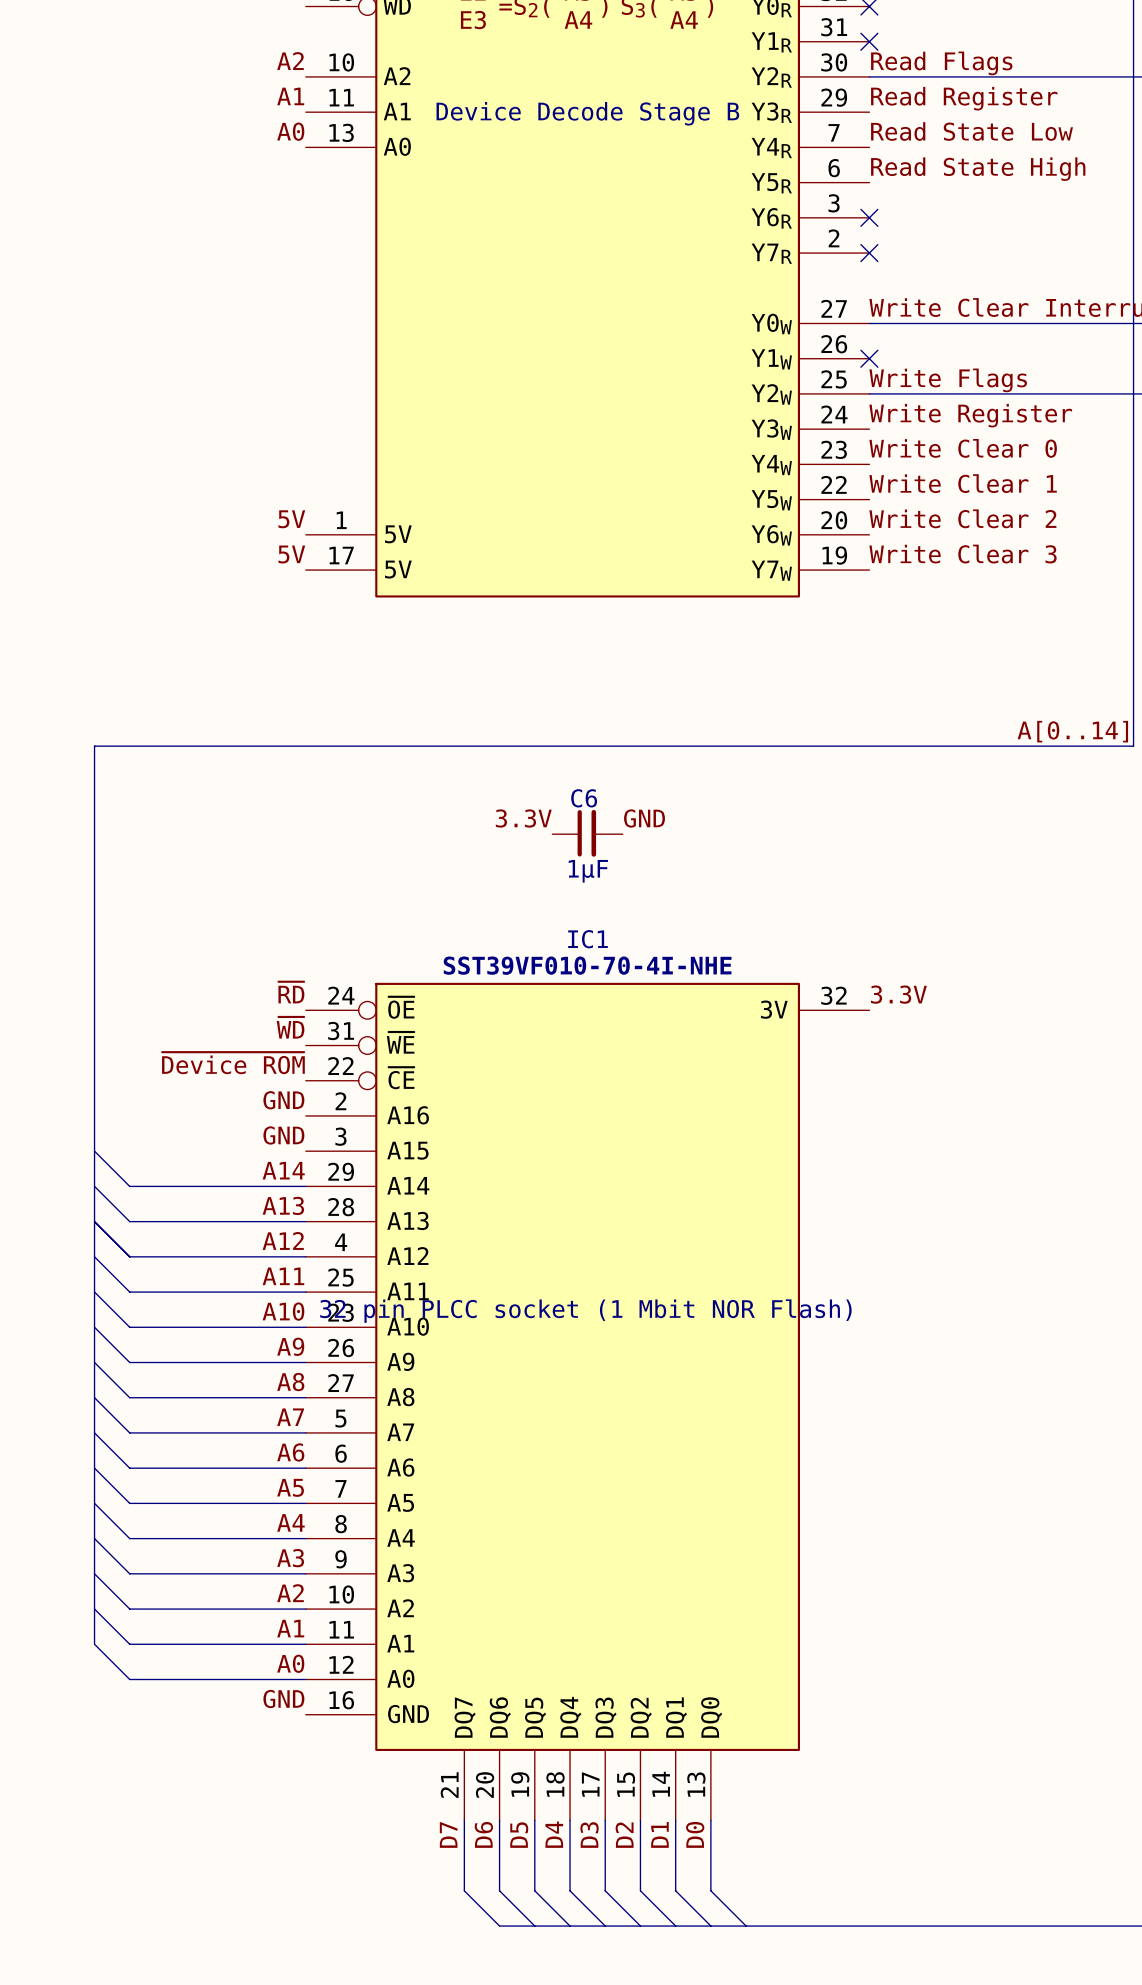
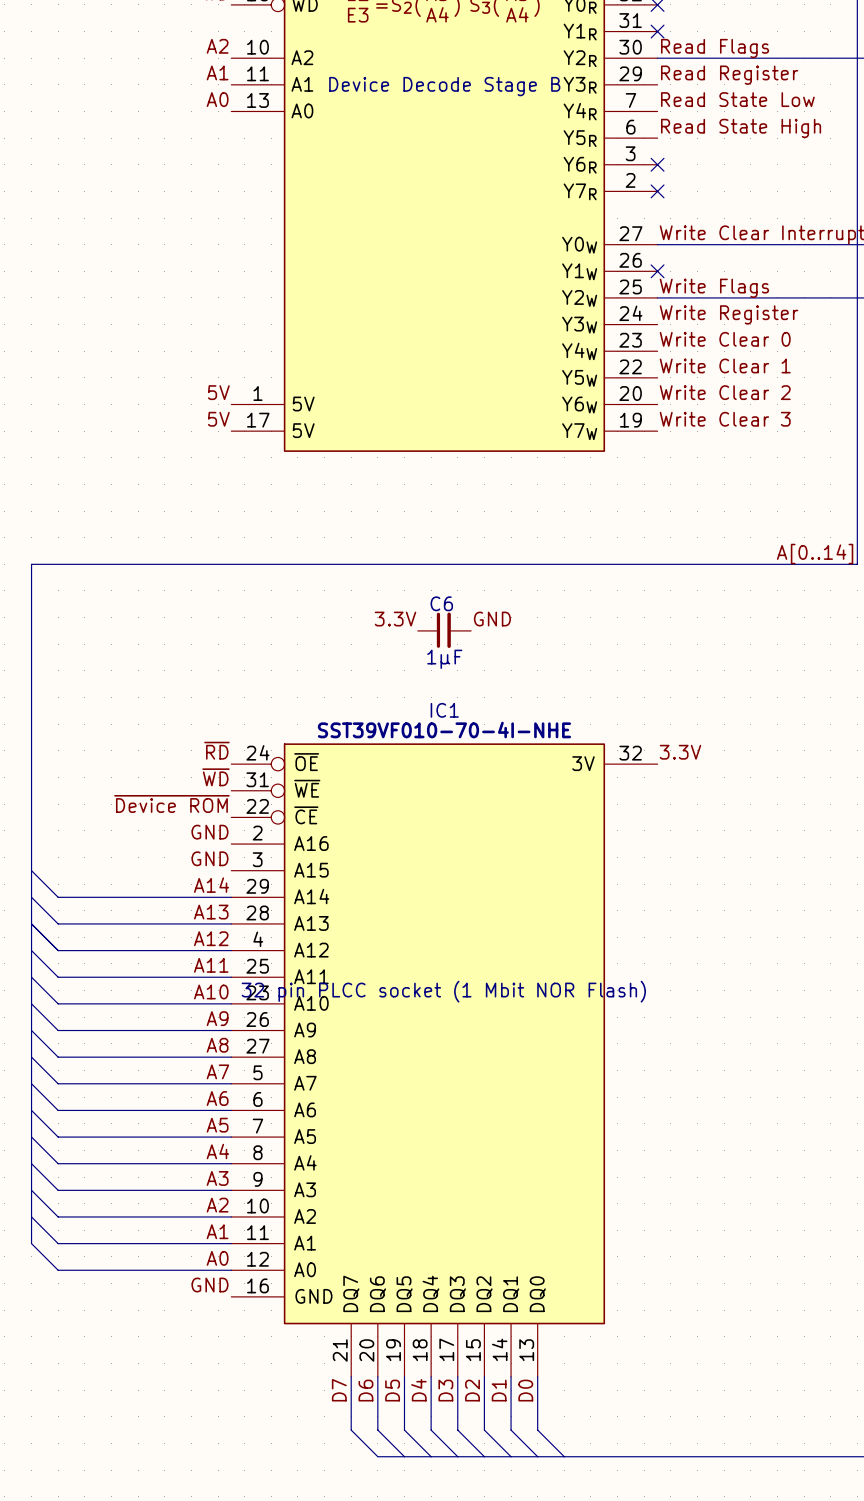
bus: (94, 746) (94, 1644) -> (71, 564) (31, 564) (31, 1243)
wire: (94, 1151) (129, 1186) -> (31, 870) (58, 897) (98, 897)
wire: (94, 1186) (129, 1221) -> (31, 897) (58, 923) (98, 923)
wire: (94, 1221) (129, 1256) -> (31, 923) (58, 950) (98, 950)
wire: (94, 1256) (129, 1292) -> (31, 950) (58, 977) (98, 977)
wire: (94, 1292) (129, 1327) -> (31, 977) (58, 1003) (98, 1003)
wire: (94, 1327) (129, 1362) -> (31, 1003) (58, 1030) (98, 1030)
wire: (94, 1362) (129, 1397) -> (31, 1030) (58, 1057) (98, 1057)
wire: (94, 1397) (129, 1432) -> (31, 1057) (58, 1083) (98, 1083)
wire: (94, 1432) (129, 1468) -> (31, 1083) (58, 1110) (98, 1110)
wire: (94, 1468) (129, 1503) -> (31, 1110) (58, 1137) (98, 1137)
wire: (94, 1503) (129, 1538) -> (31, 1137) (58, 1163) (98, 1163)
wire: (94, 1538) (129, 1573) -> (31, 1163) (58, 1190) (98, 1190)
wire: (94, 1573) (129, 1609) -> (31, 1190) (58, 1216) (98, 1216)
wire: (94, 1609) (129, 1644) -> (31, 1216) (58, 1243) (98, 1243)
wire: (94, 1644) (129, 1679) -> (31, 1243) (58, 1270) (98, 1270)

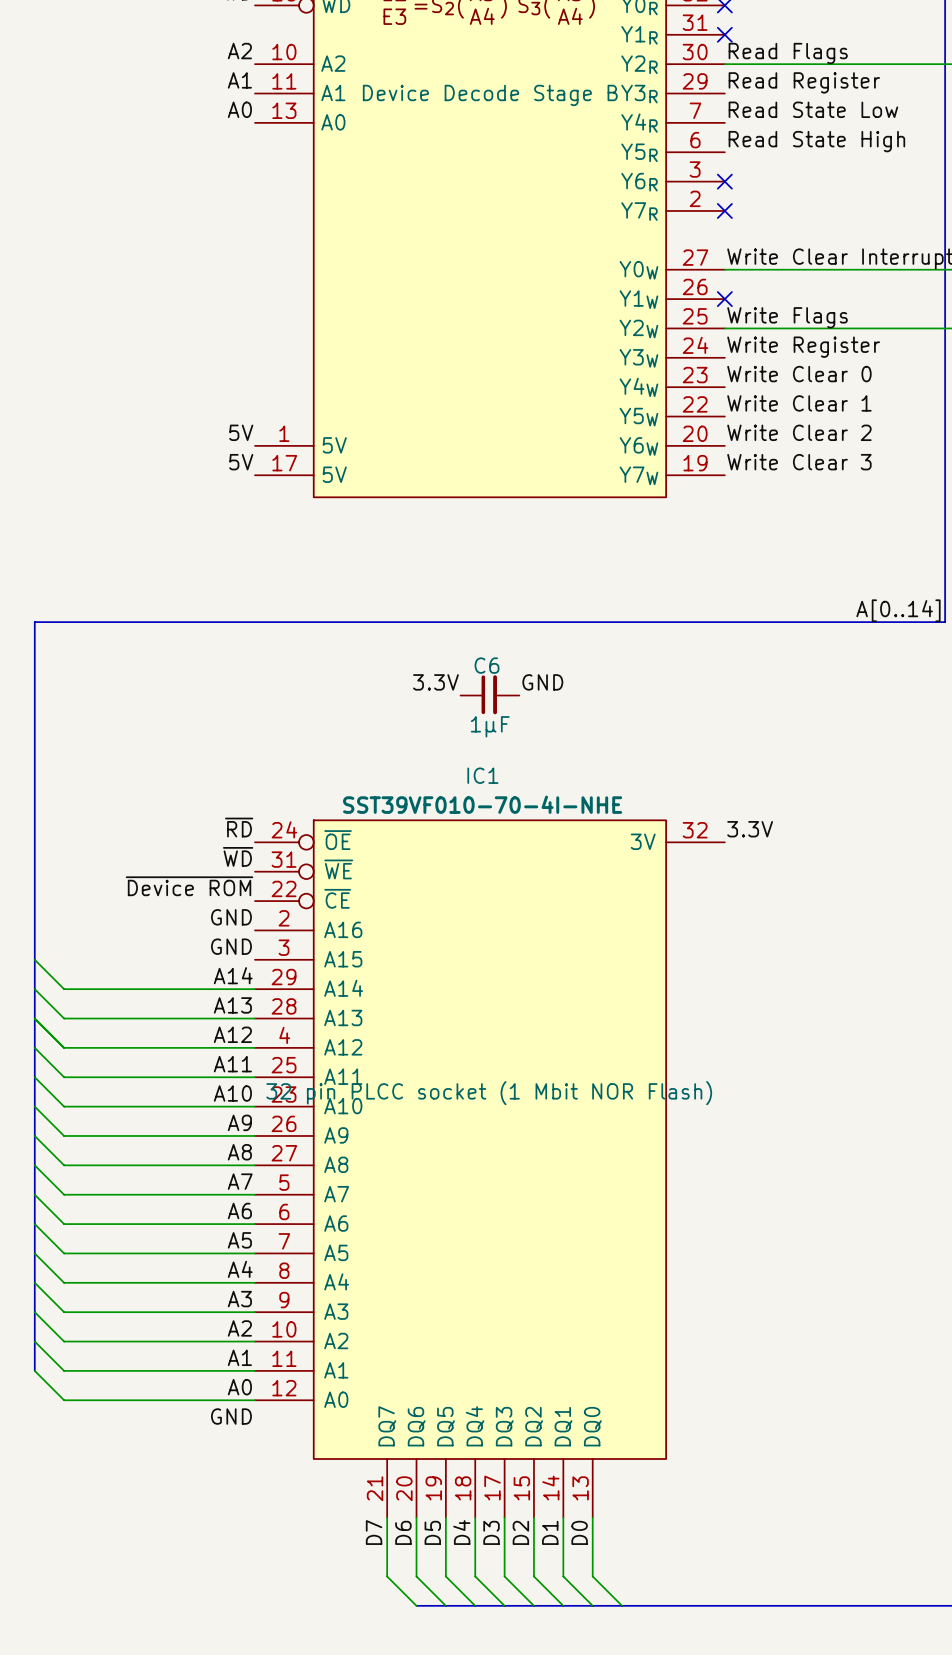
IC1 symbol: [231, 743, 658, 1377] -> [255, 819, 725, 1518]

